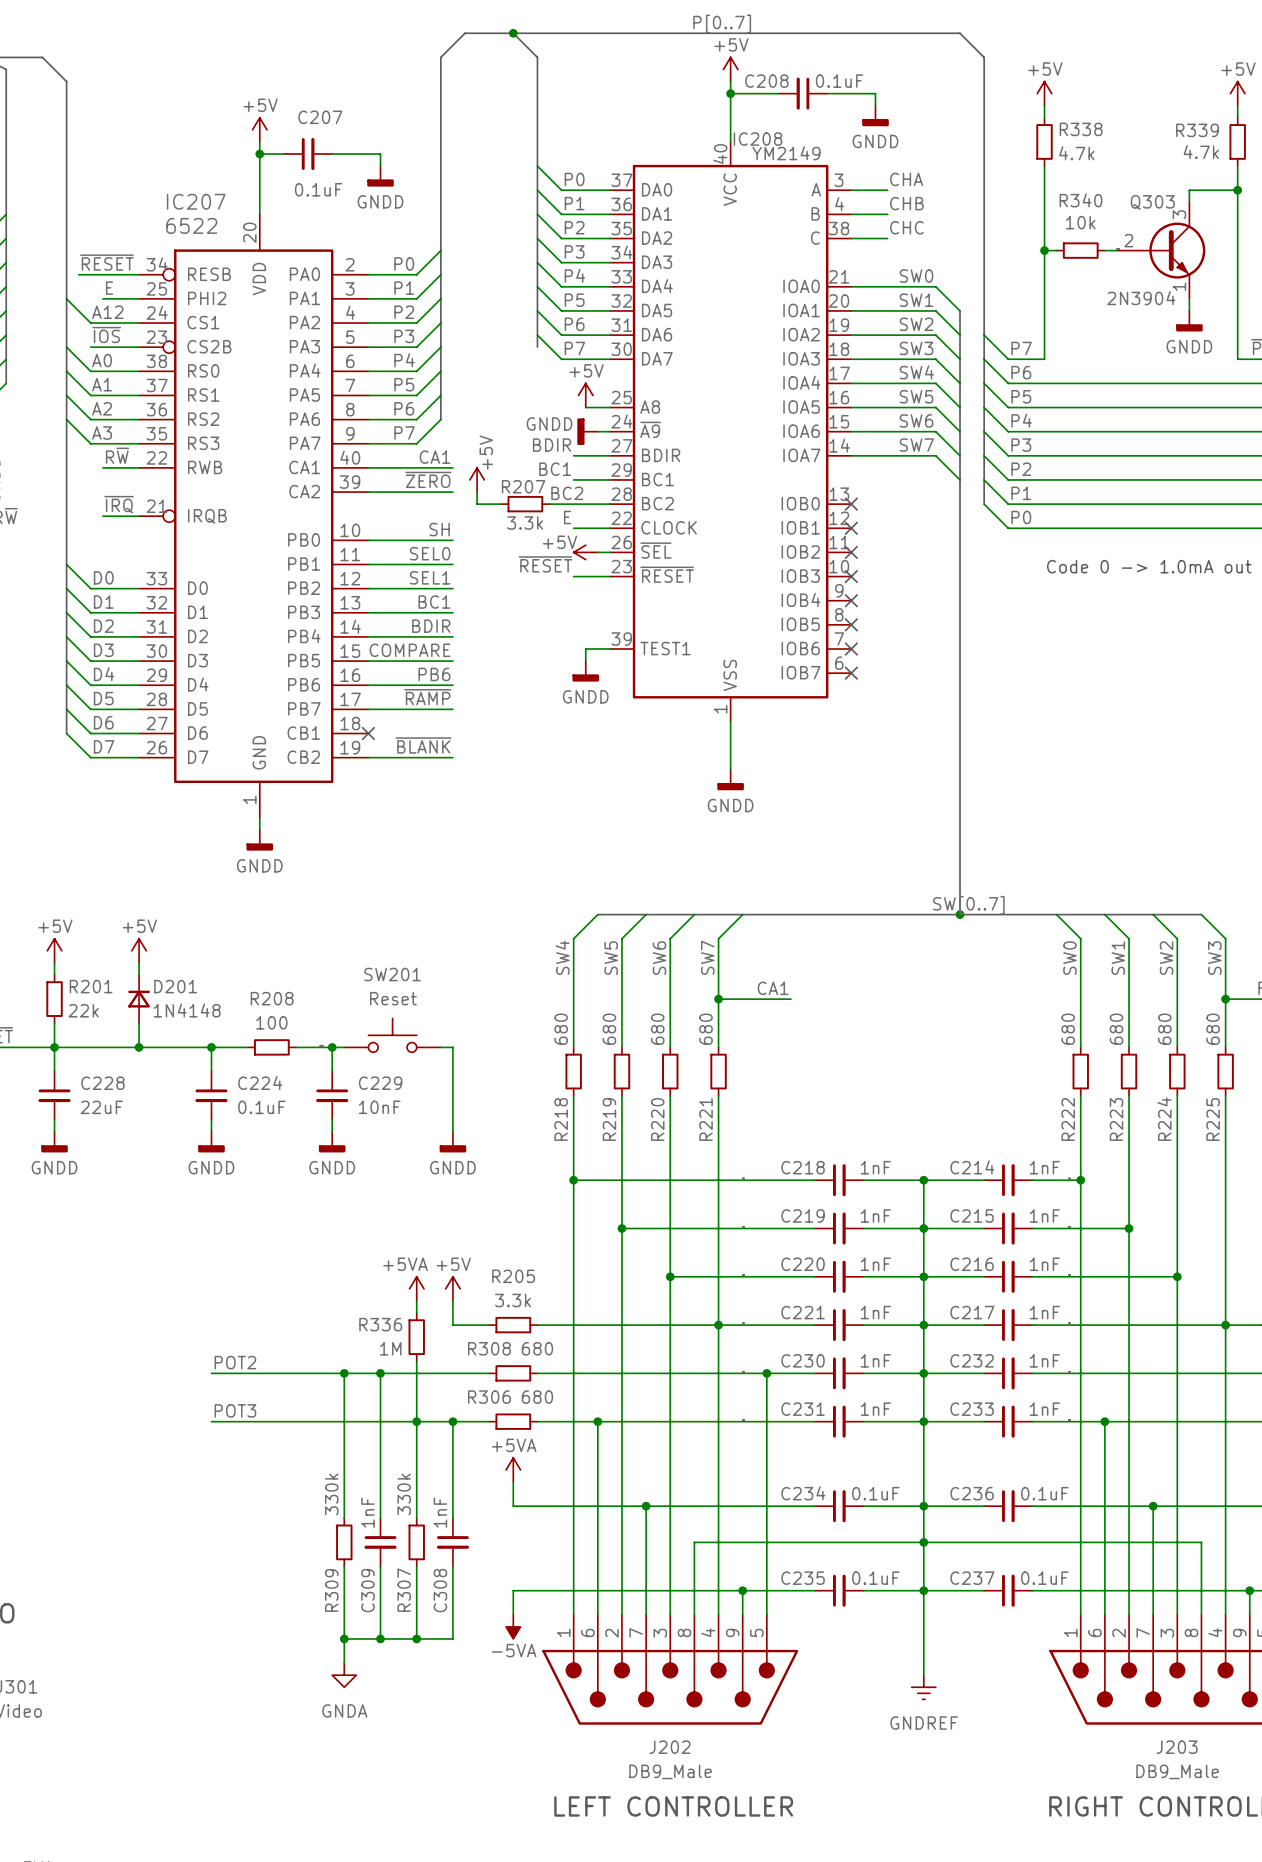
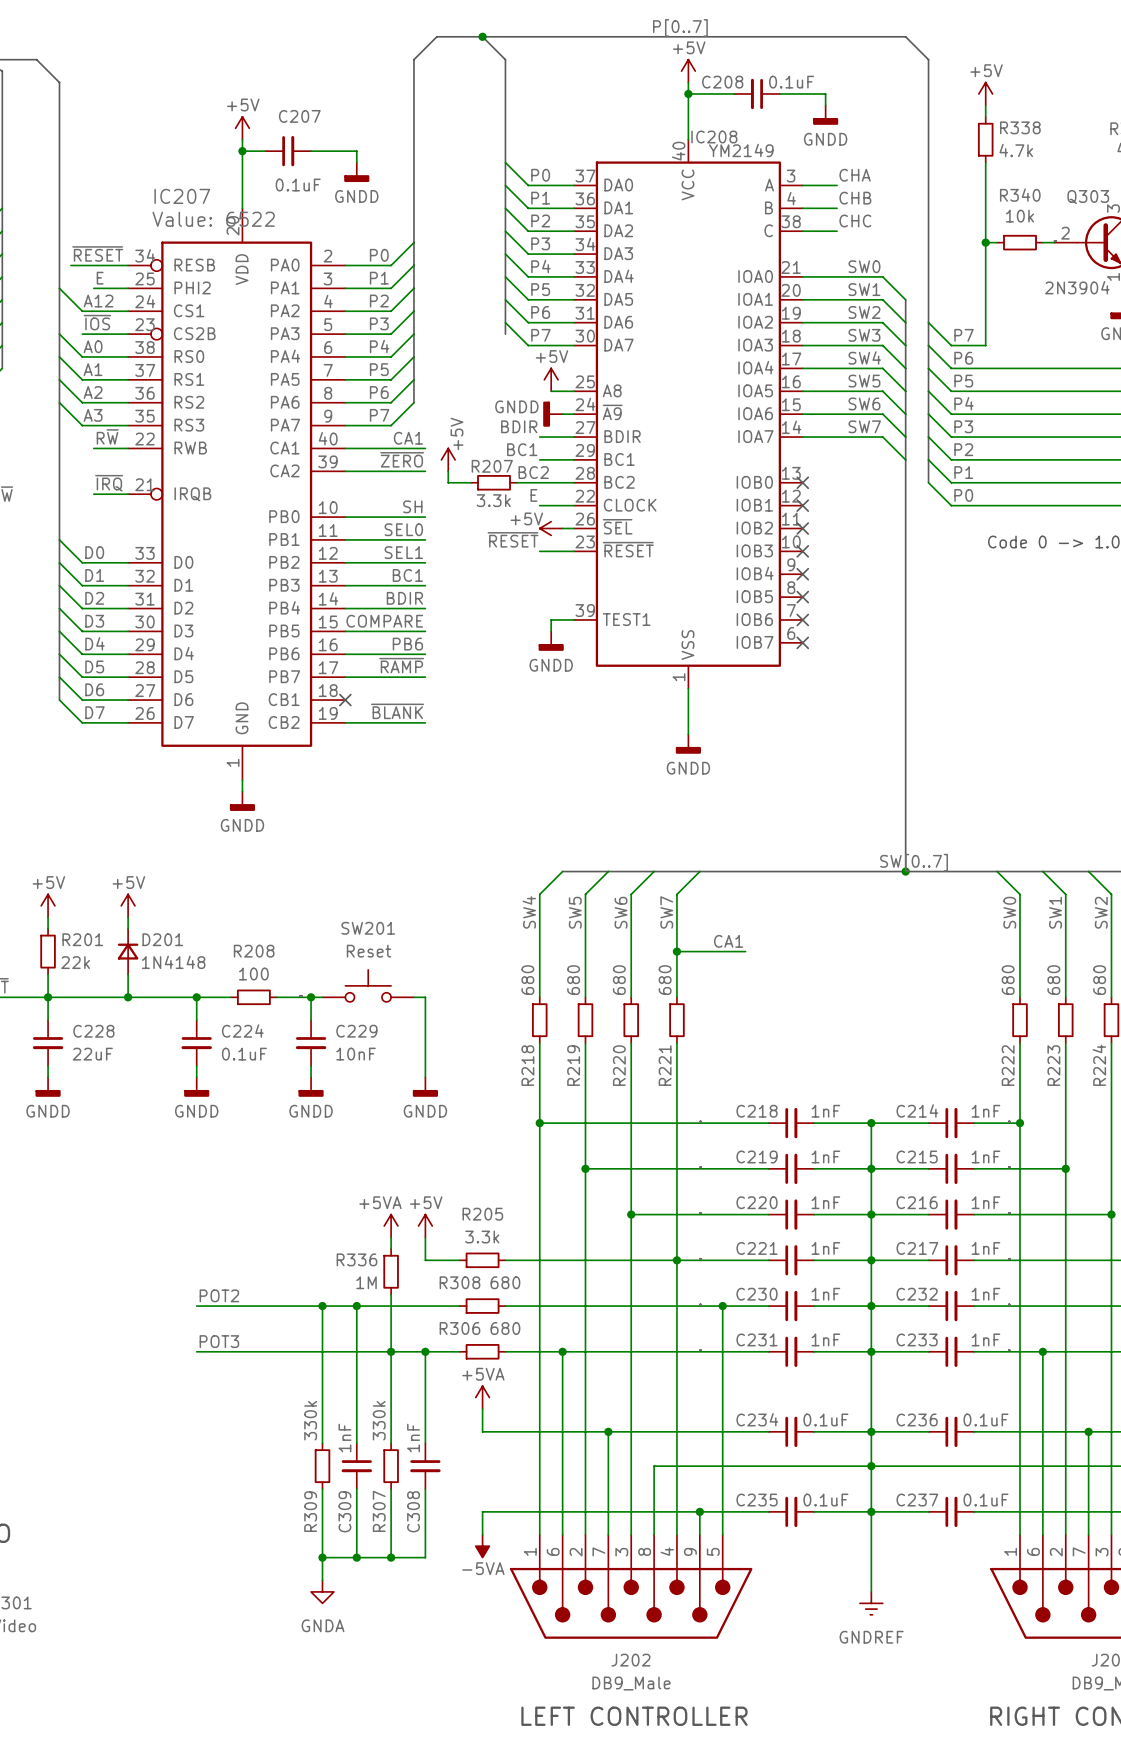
IC207 value: 6522 (191, 225) -> Value: 6522 (213, 219)

